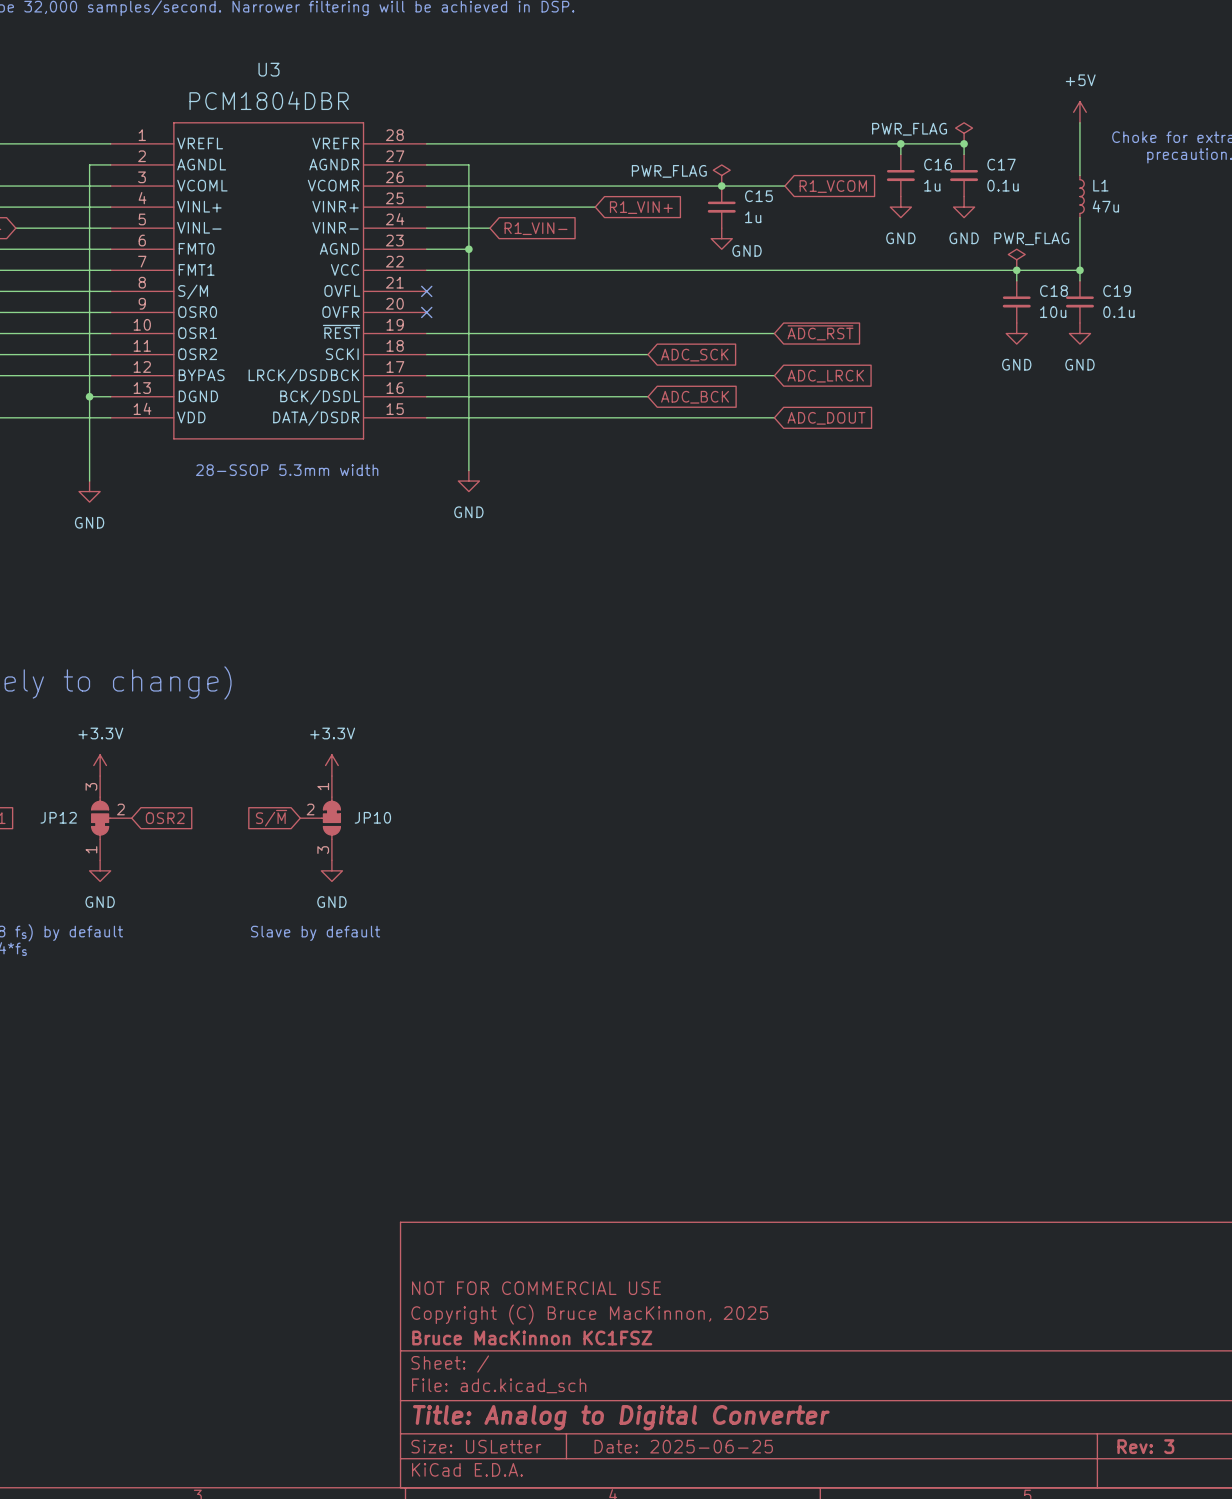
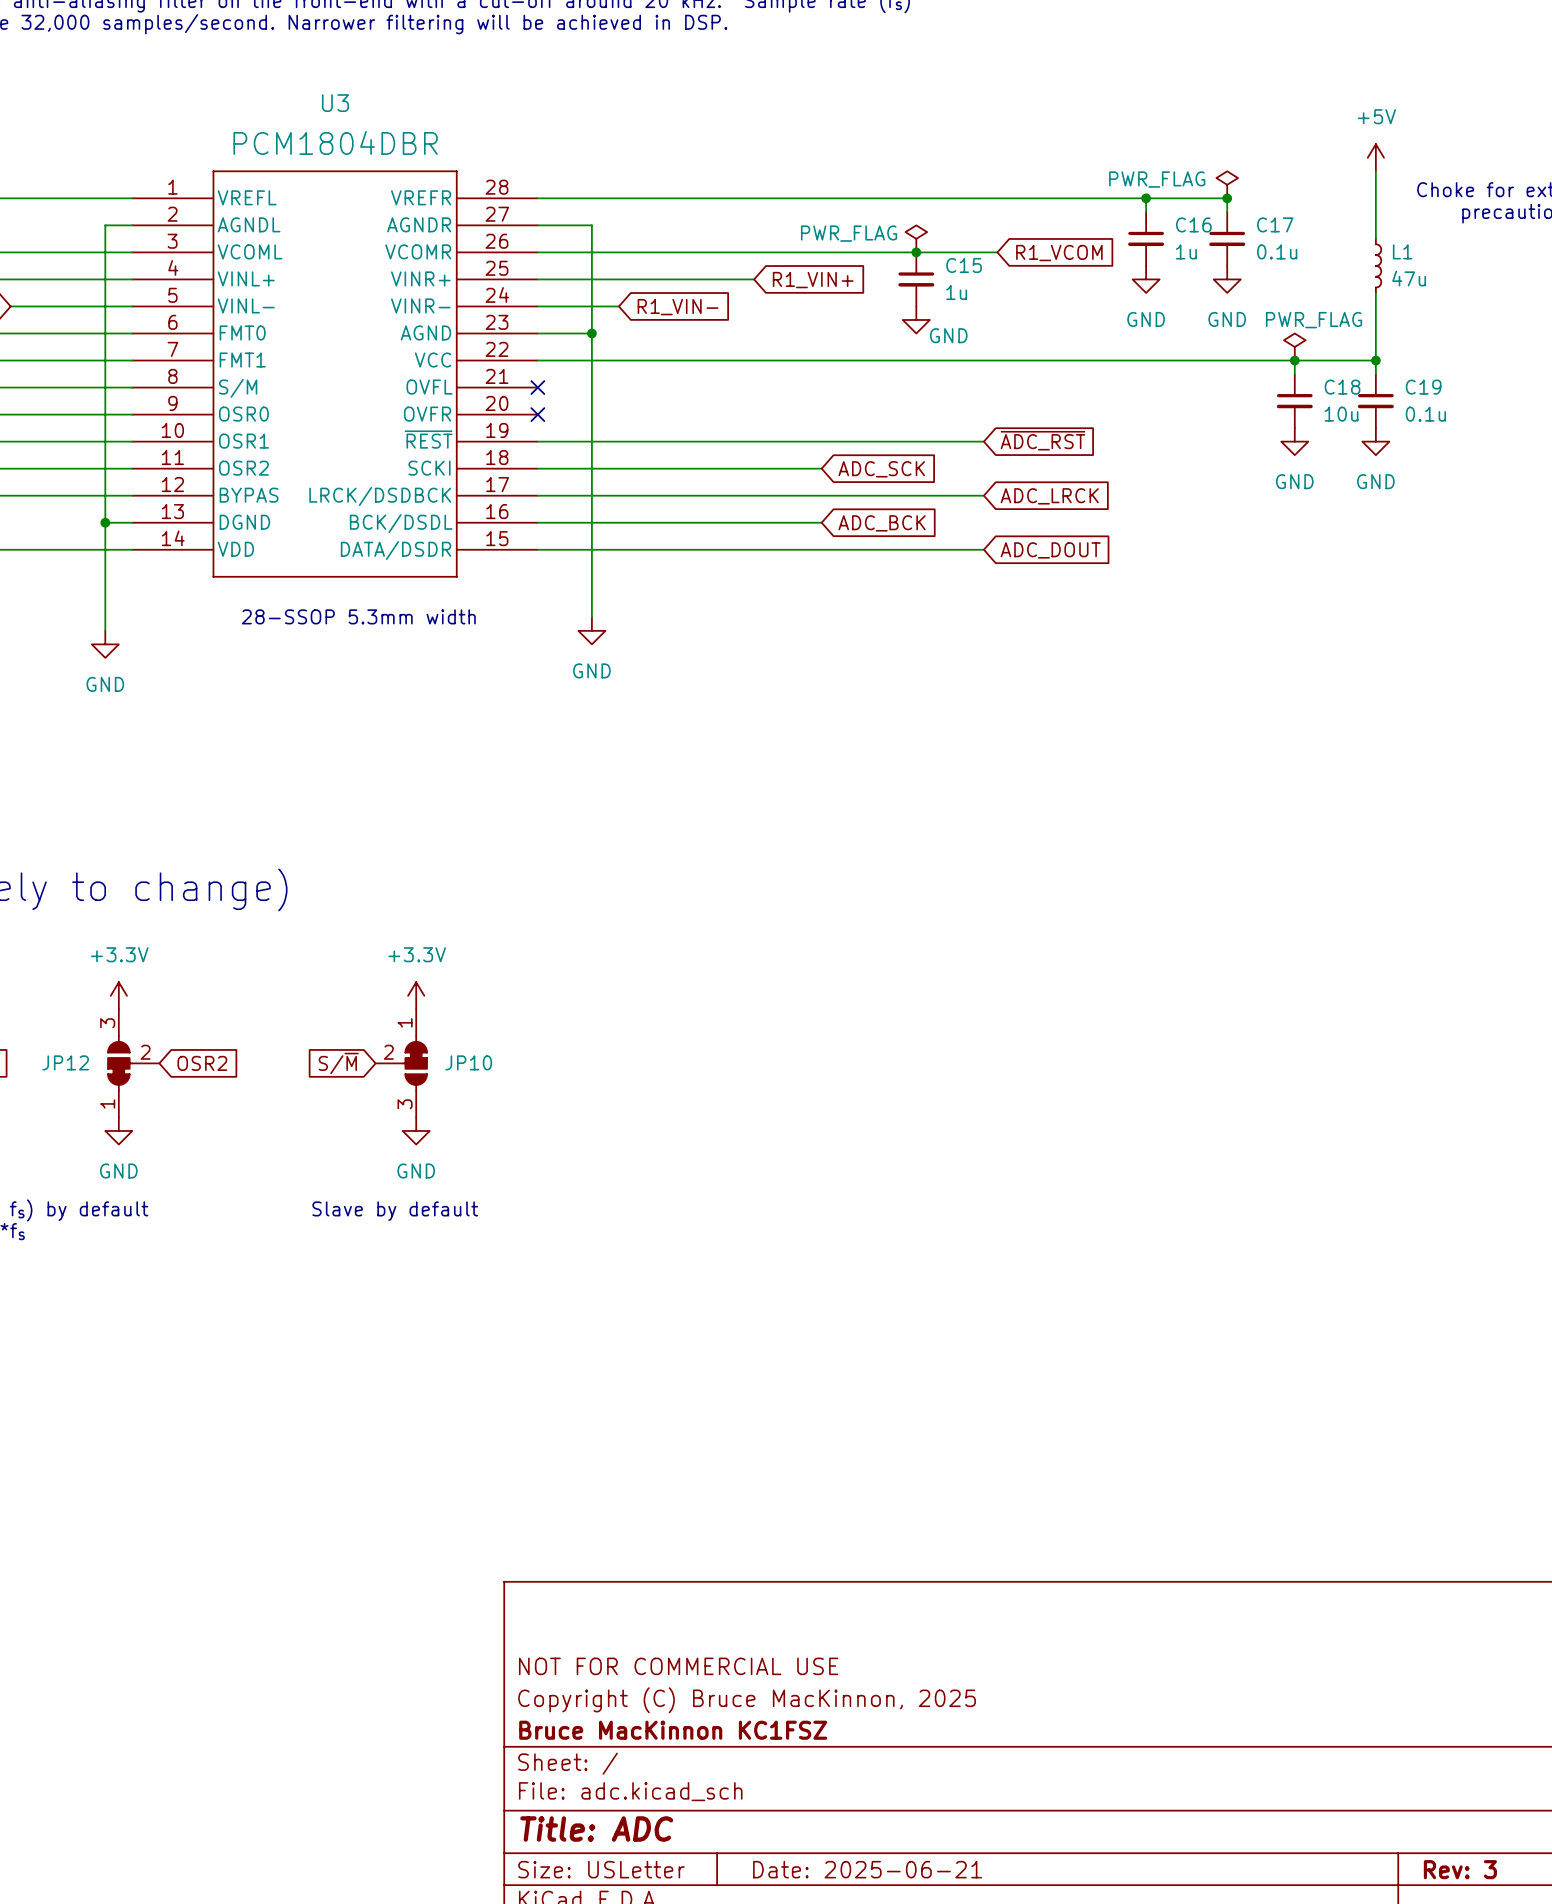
title block: Title: Analog to Digital Converter (621, 1417) -> Title: ADC (596, 1829)
title block: Date: 2025-06-25 (683, 1446) -> Date: 2025-06-21 (867, 1869)

